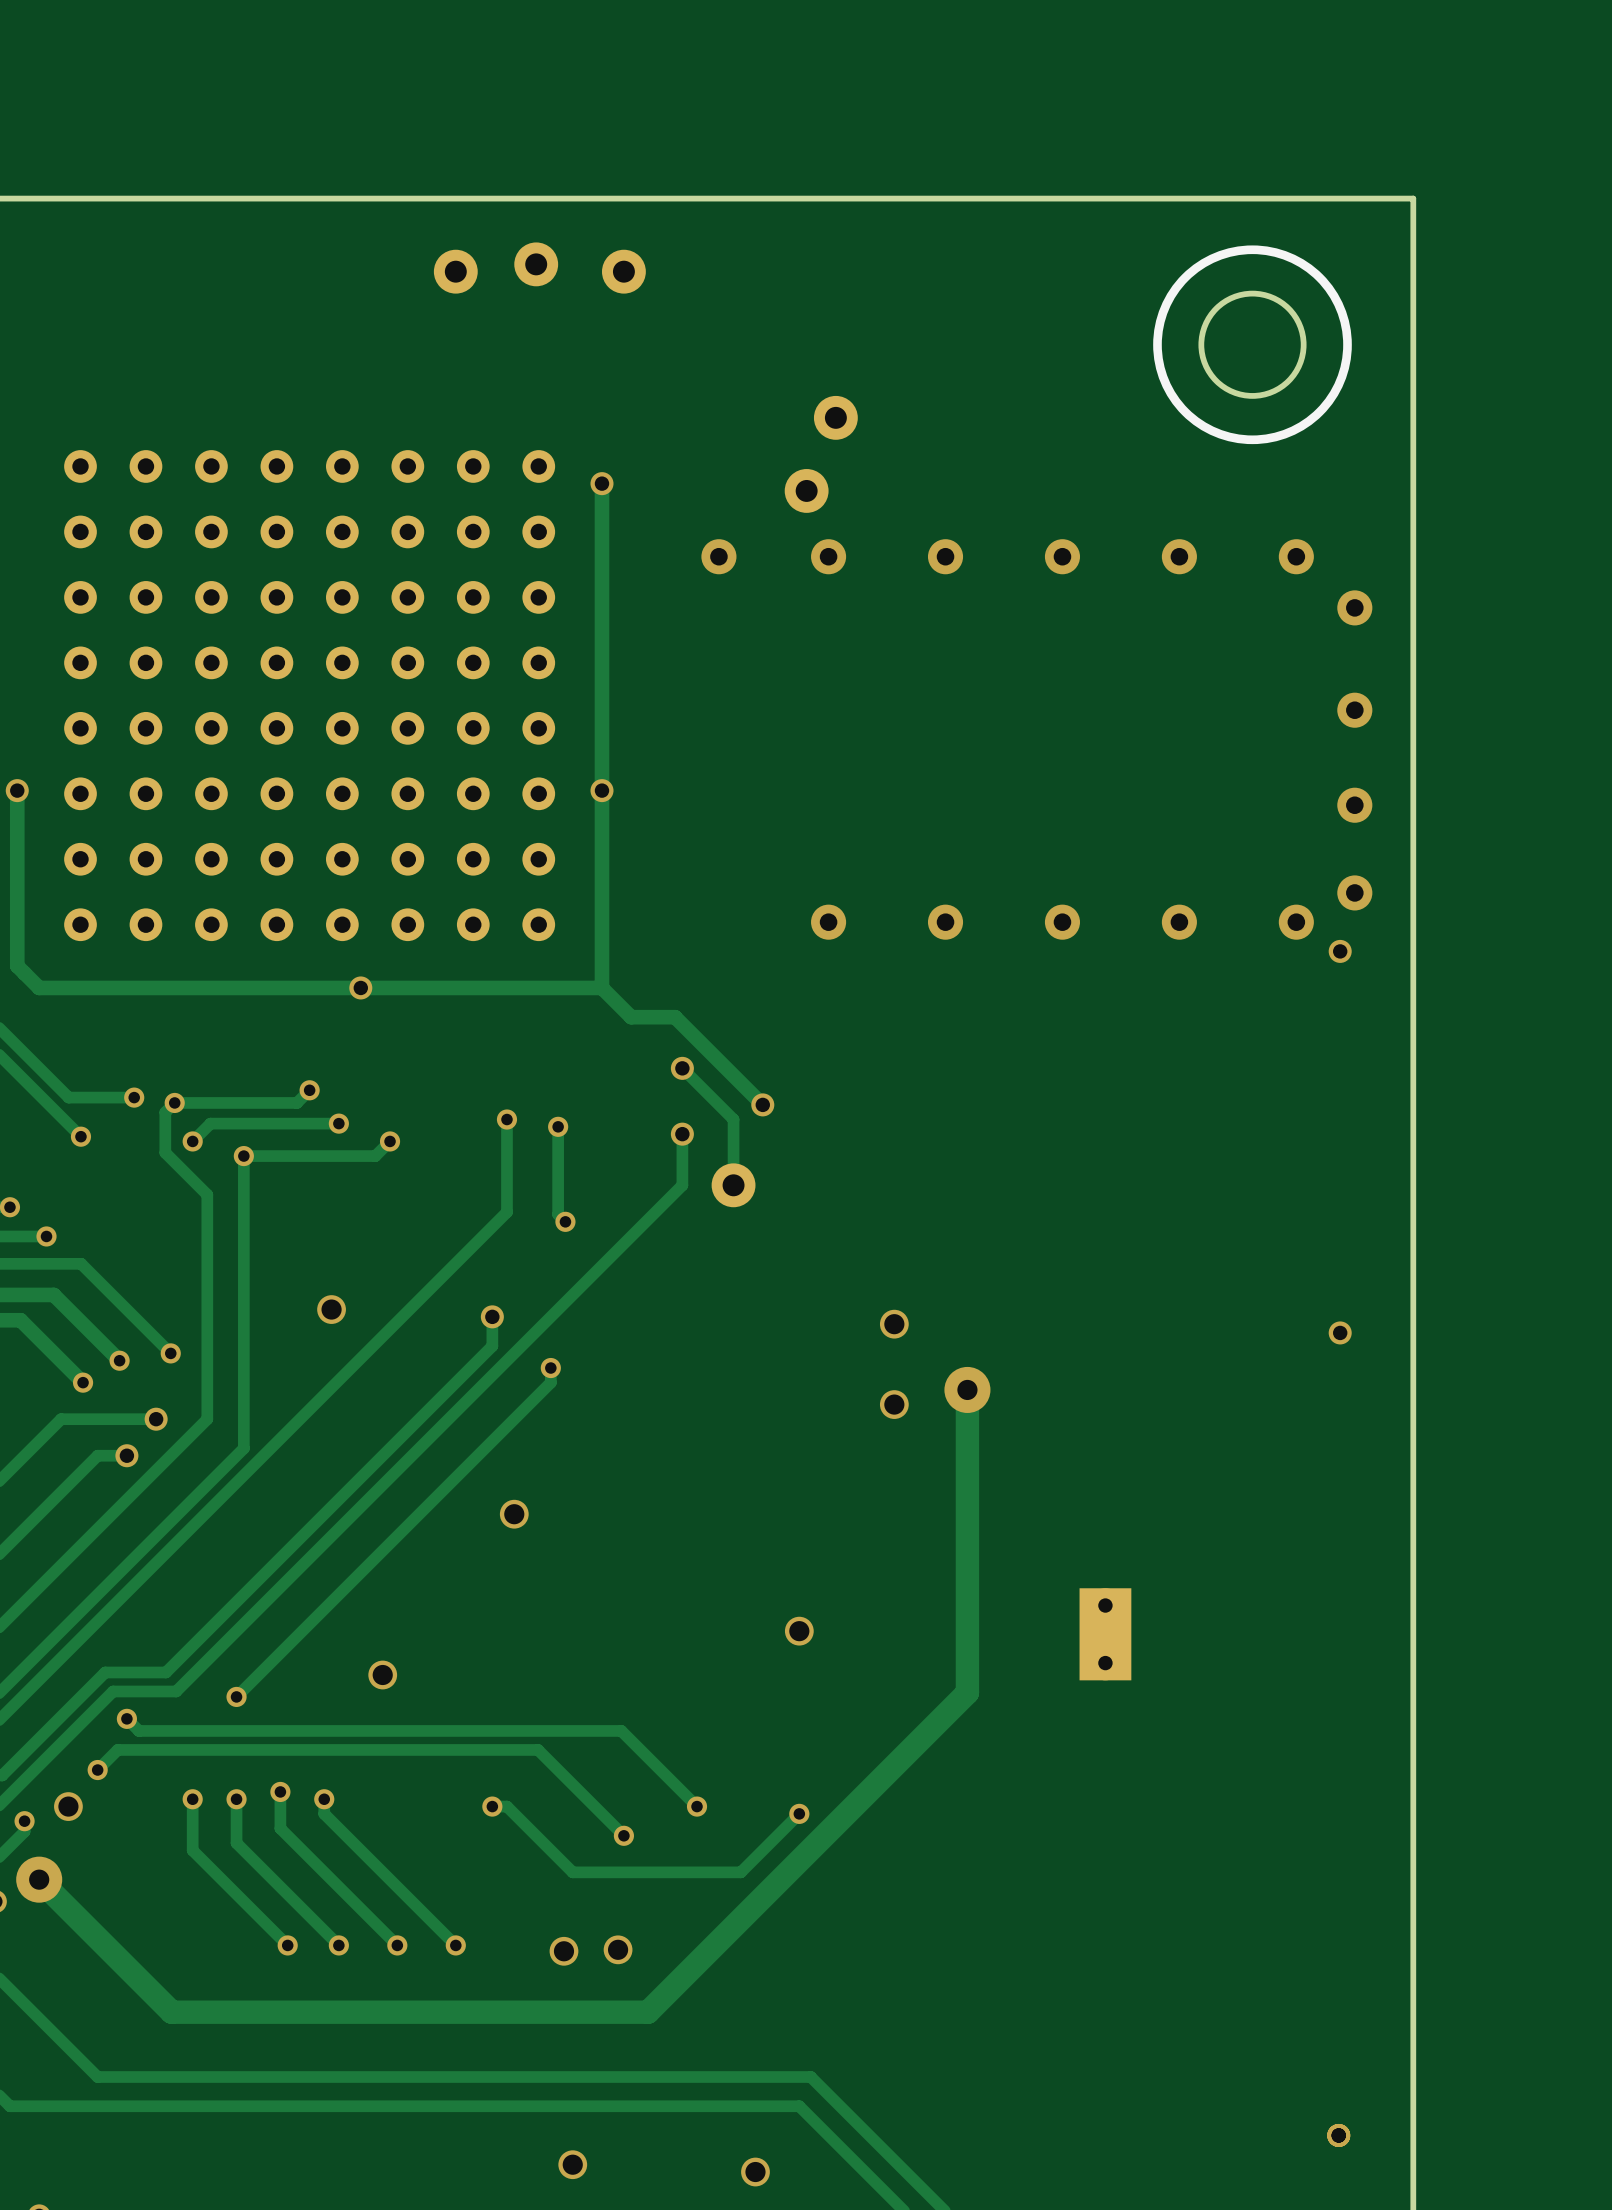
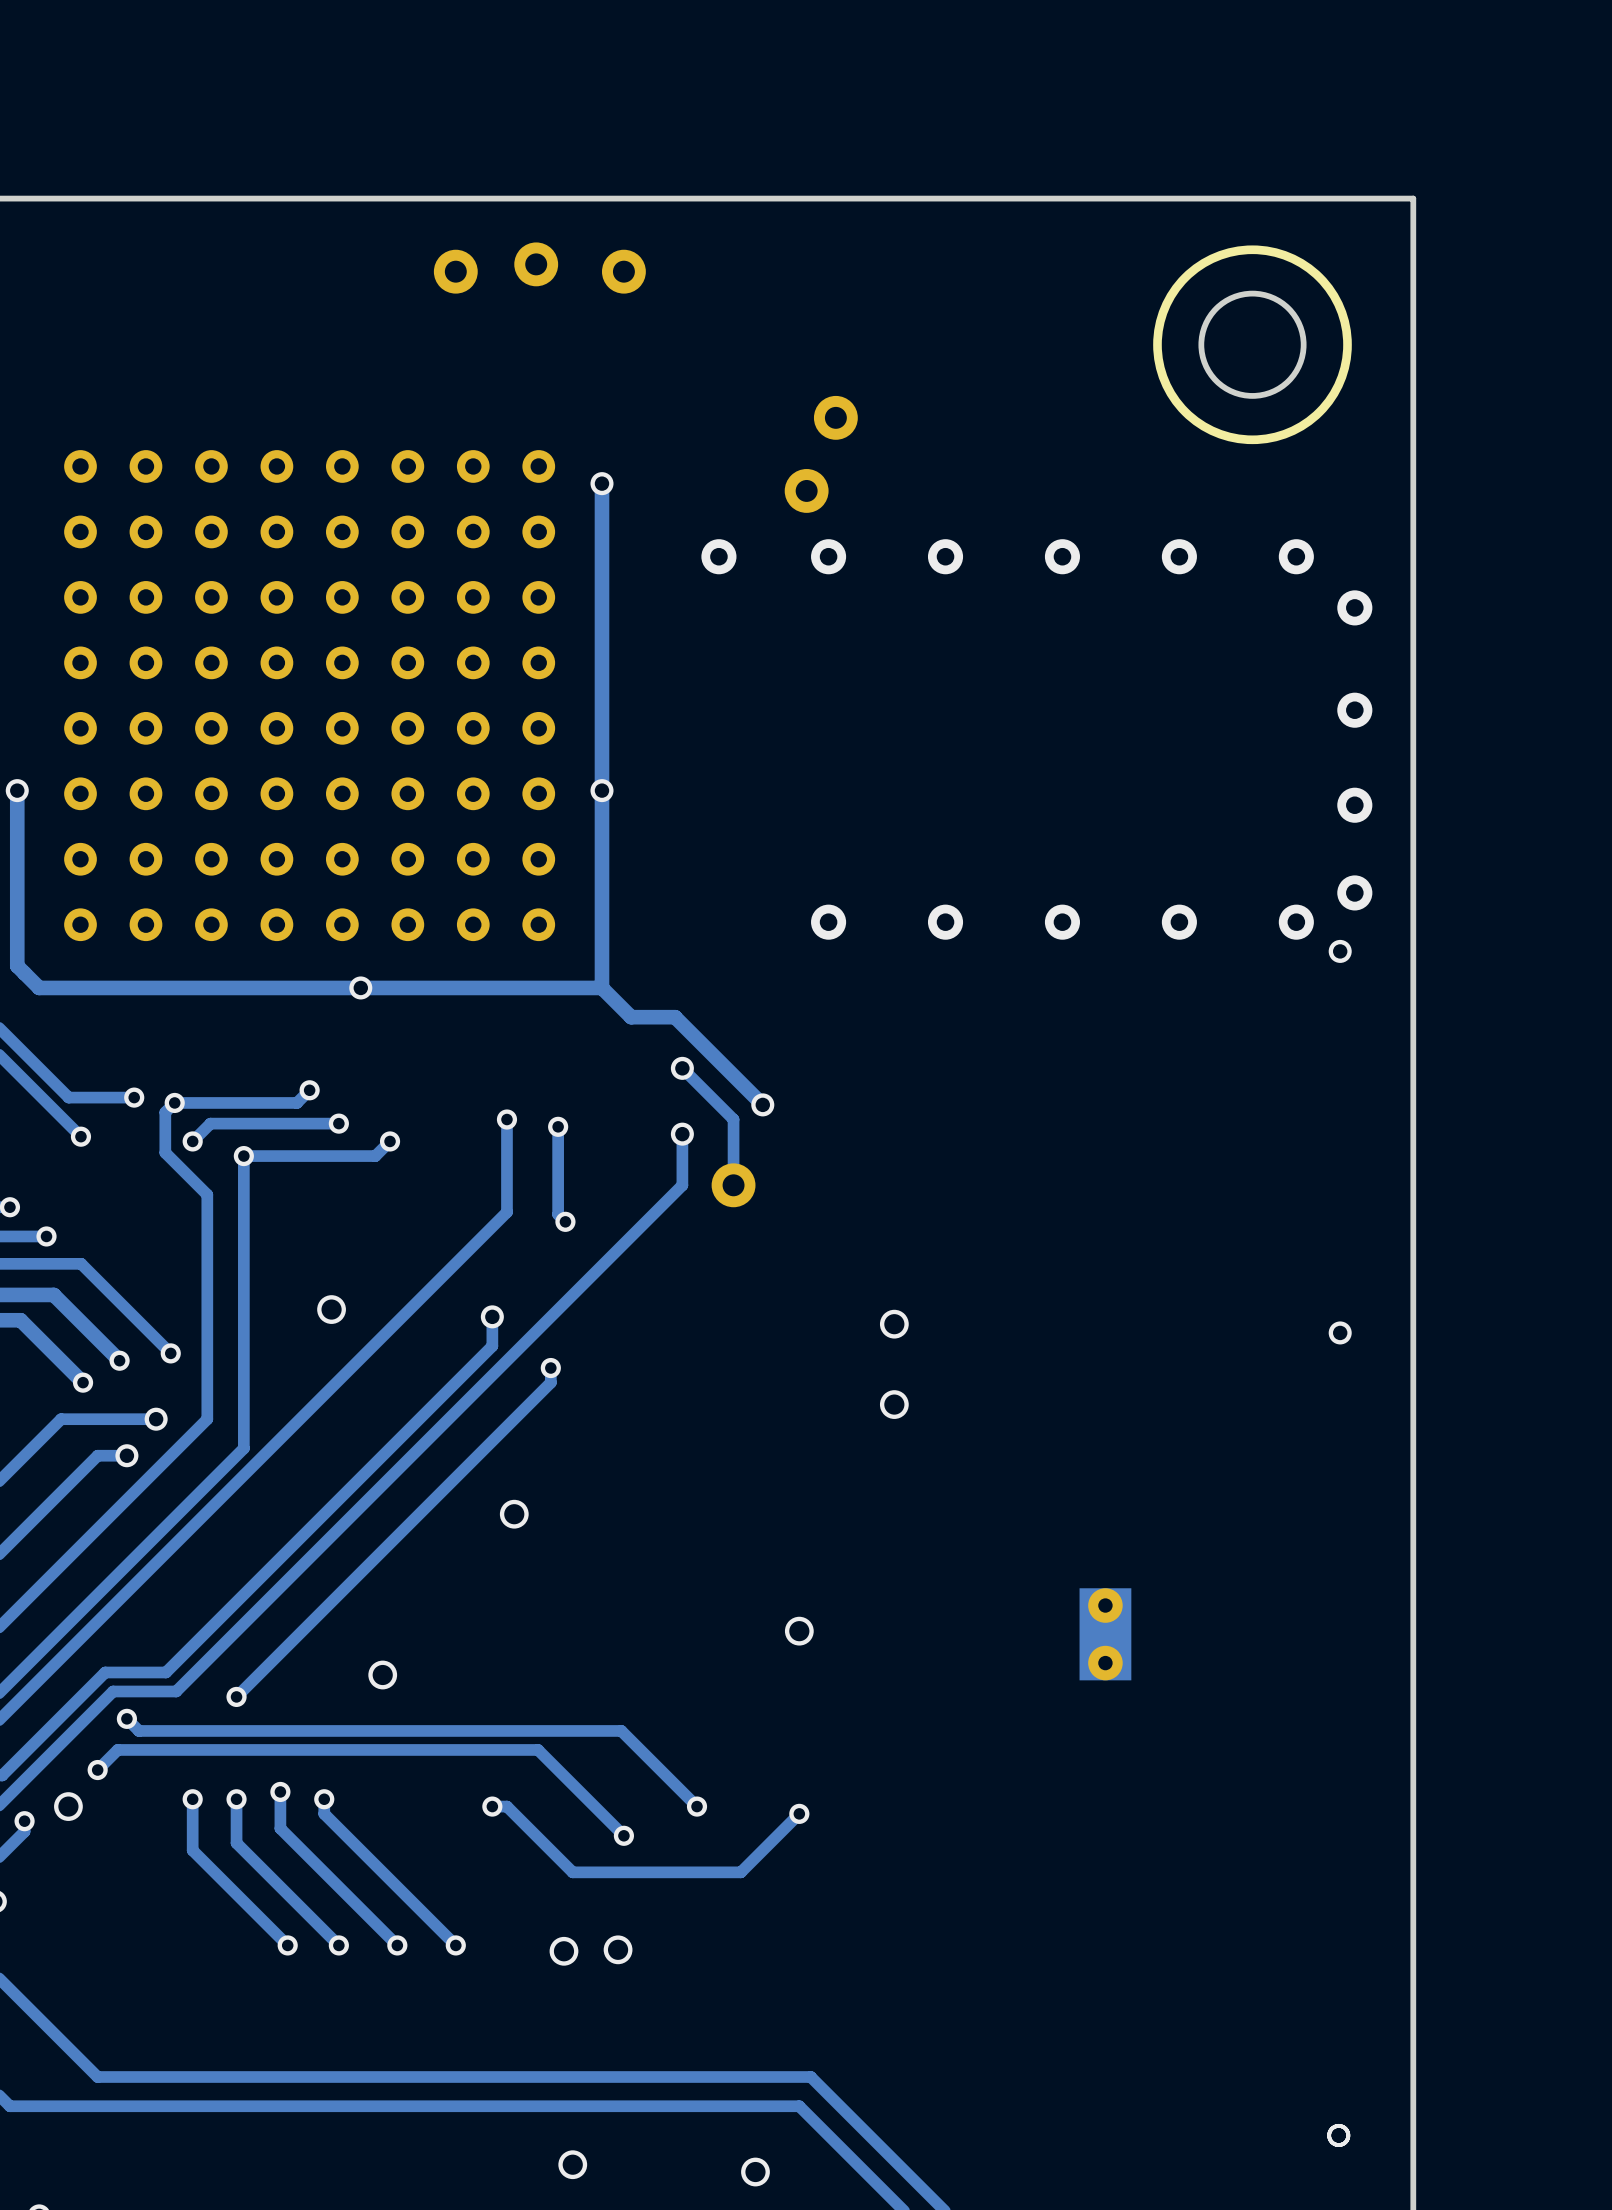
track: (967, 1389) (967, 1692) (647, 2012) (171, 2012) (39, 1879) -> none
via: (967, 1389) -> none
via: (39, 1879) -> none

